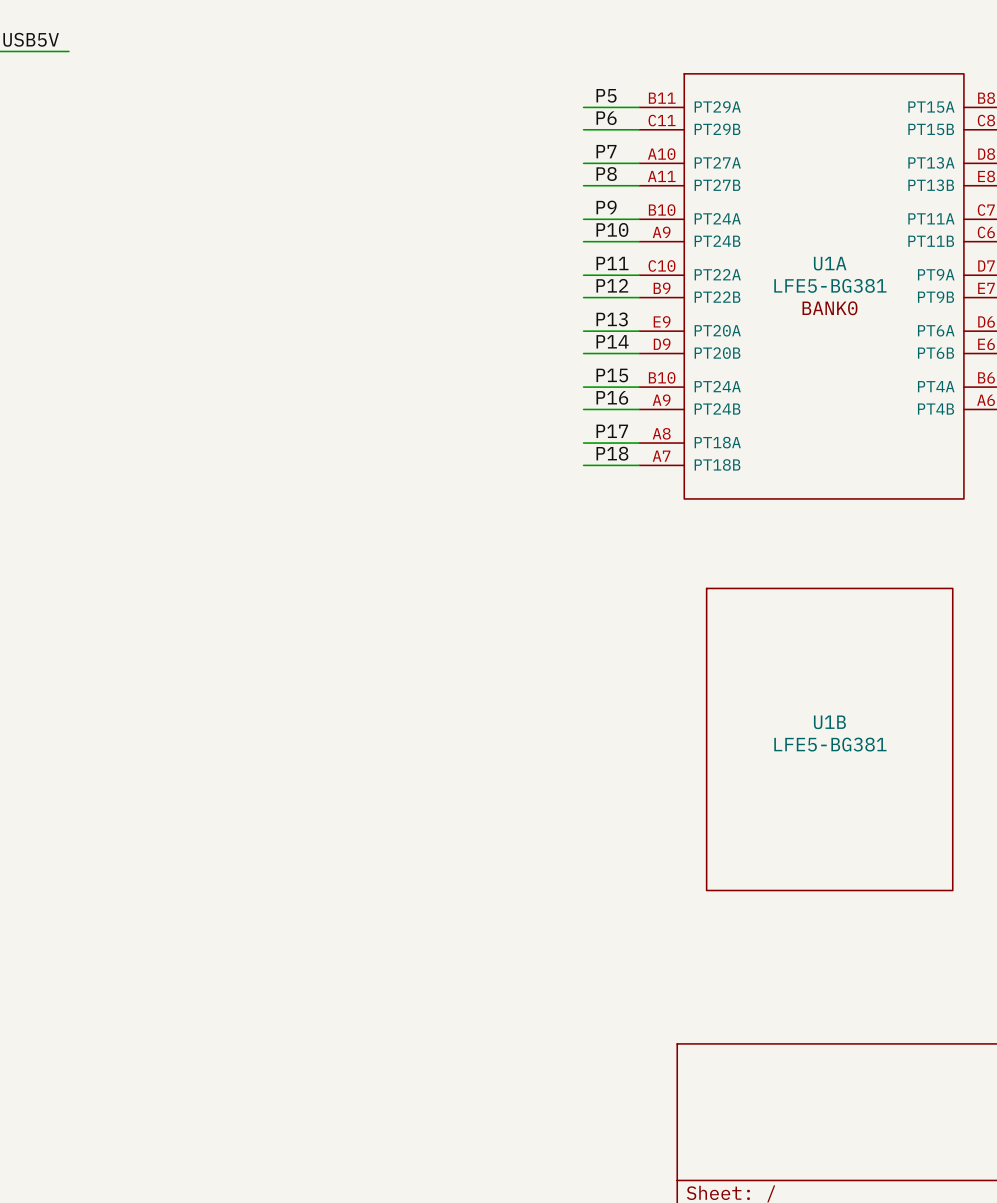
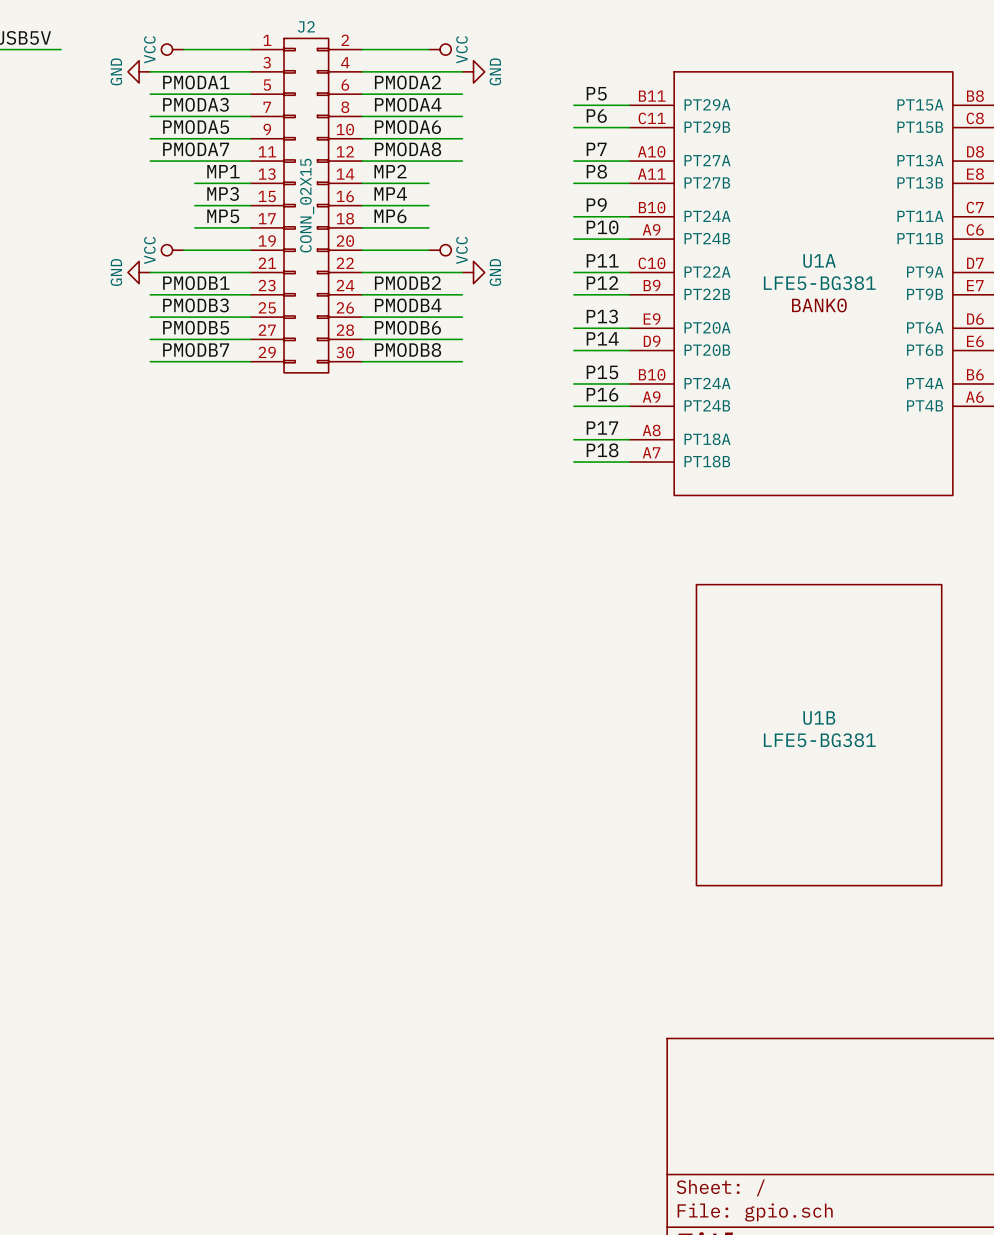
power symbol: none -> VCC (172, 49)
wire: none -> (183, 49) (250, 49)
wire: none -> (362, 49) (428, 49)
power symbol: none -> VCC (440, 49)
power symbol: none -> GND (139, 71)
wire: none -> (150, 71) (250, 71)
wire: none -> (362, 71) (462, 71)
power symbol: none -> GND (473, 71)
label: none -> PMODA1 (196, 82)
label: none -> PMODA2 (407, 82)
wire: none -> (150, 94) (250, 94)
wire: none -> (362, 94) (462, 94)
label: none -> PMODA3 (195, 104)
label: none -> PMODA4 (408, 104)
wire: none -> (150, 116) (250, 116)
wire: none -> (362, 116) (462, 116)
label: none -> PMODA5 (196, 127)
label: none -> PMODA6 (407, 127)
wire: none -> (150, 138) (250, 138)
wire: none -> (362, 138) (462, 138)
label: none -> PMODA7 (196, 149)
label: none -> PMODA8 (408, 149)
wire: none -> (150, 161) (250, 161)
wire: none -> (362, 161) (462, 161)
label: none -> MP2 (390, 171)
label: none -> MP1 (223, 171)
wire: none -> (194, 183) (250, 183)
wire: none -> (362, 183) (428, 183)
label: none -> MP3 (223, 193)
label: none -> MP4 (390, 193)
wire: none -> (194, 205) (250, 205)
J2: none -> CONN_02X15 (306, 205)
wire: none -> (362, 205) (428, 205)
label: none -> MP5 (223, 216)
label: none -> MP6 (390, 216)
wire: none -> (194, 227) (250, 227)
wire: none -> (362, 227) (428, 227)
power symbol: none -> VCC (172, 250)
wire: none -> (183, 250) (250, 250)
wire: none -> (362, 250) (428, 250)
power symbol: none -> VCC (440, 250)
power symbol: none -> GND (139, 272)
wire: none -> (150, 272) (250, 272)
wire: none -> (362, 272) (462, 272)
power symbol: none -> GND (473, 272)
label: none -> PMODB1 (196, 283)
label: none -> PMODB2 (407, 283)
wire: none -> (150, 294) (250, 294)
wire: none -> (362, 294) (462, 294)
label: none -> PMODB3 (195, 305)
label: none -> PMODB4 (408, 305)
wire: none -> (150, 317) (250, 317)
wire: none -> (362, 317) (462, 317)
label: none -> PMODB5 (196, 327)
label: none -> PMODB6 (407, 327)
wire: none -> (150, 339) (250, 339)
wire: none -> (362, 339) (462, 339)
label: none -> PMODB7 (196, 350)
label: none -> PMODB8 (408, 350)
wire: none -> (150, 361) (250, 361)
wire: none -> (362, 361) (462, 361)

